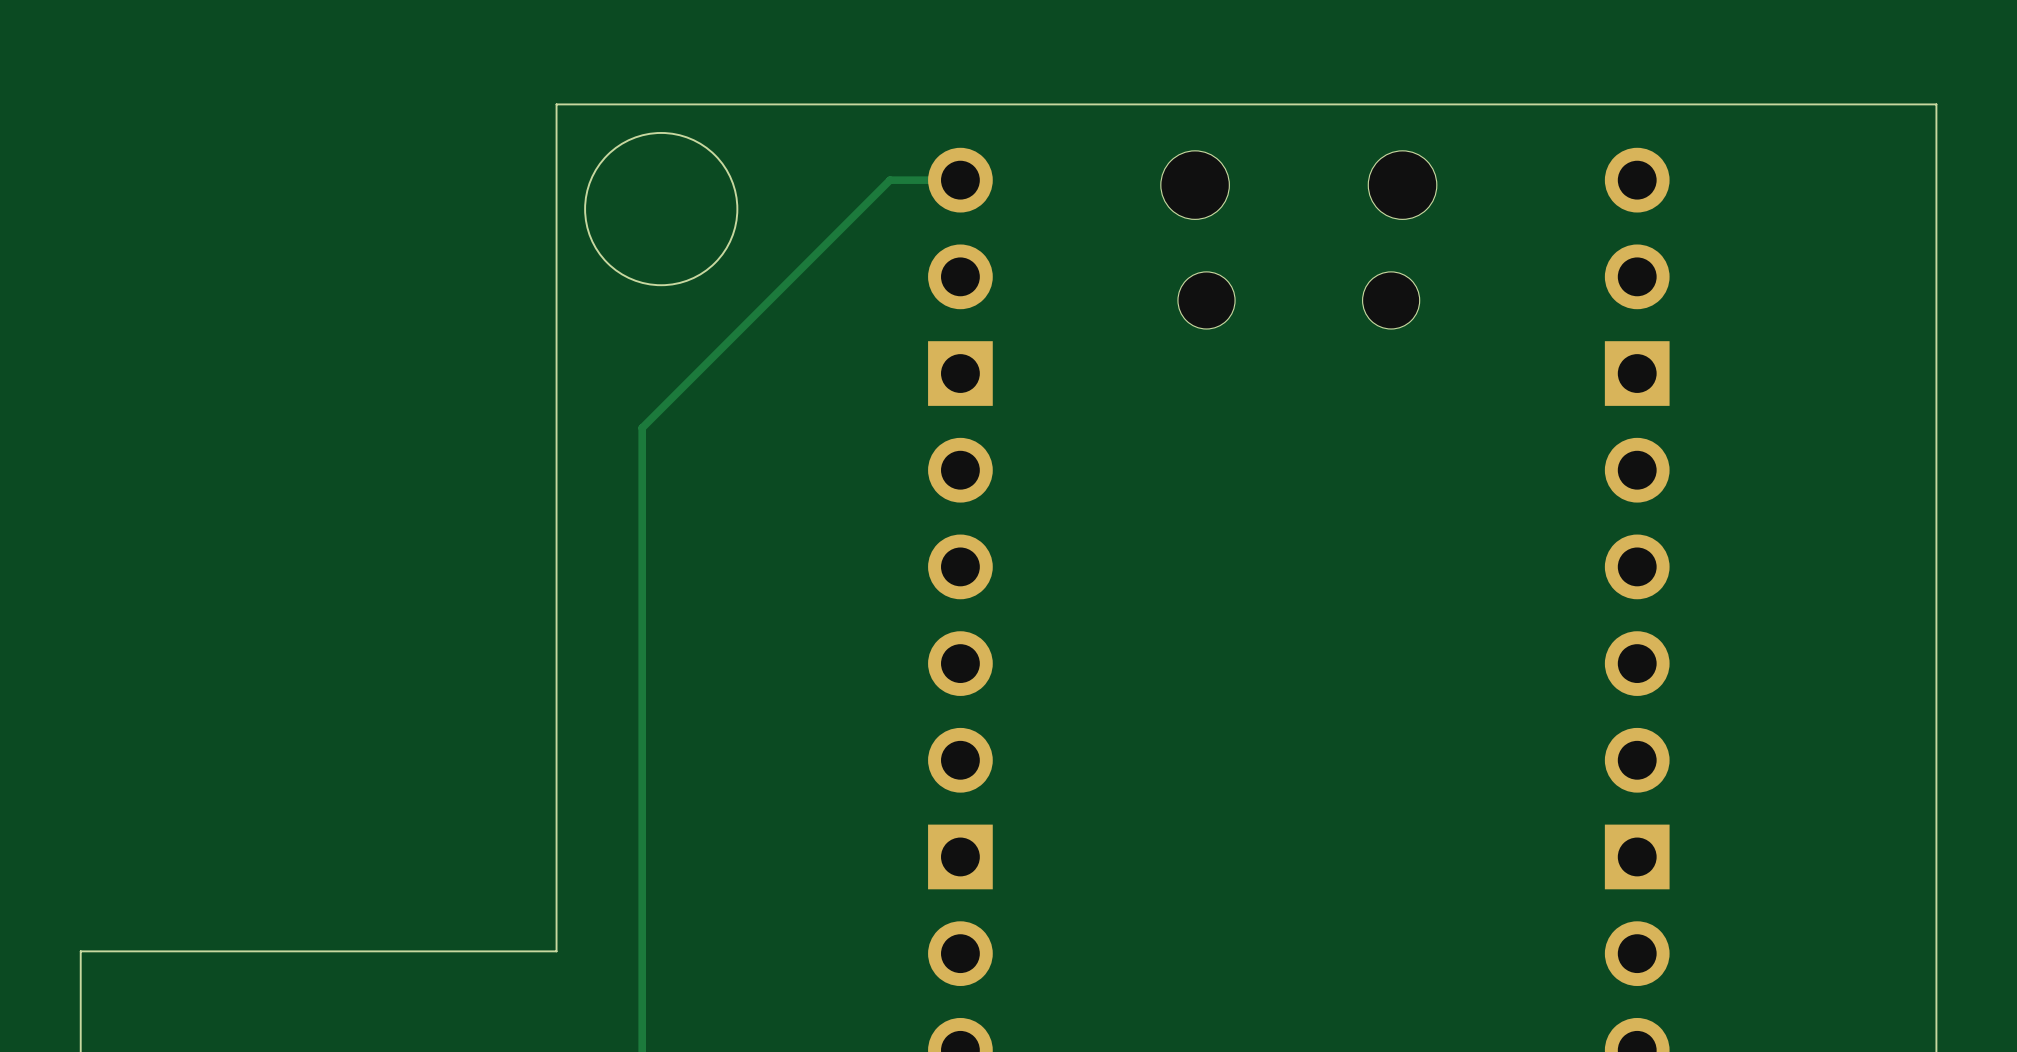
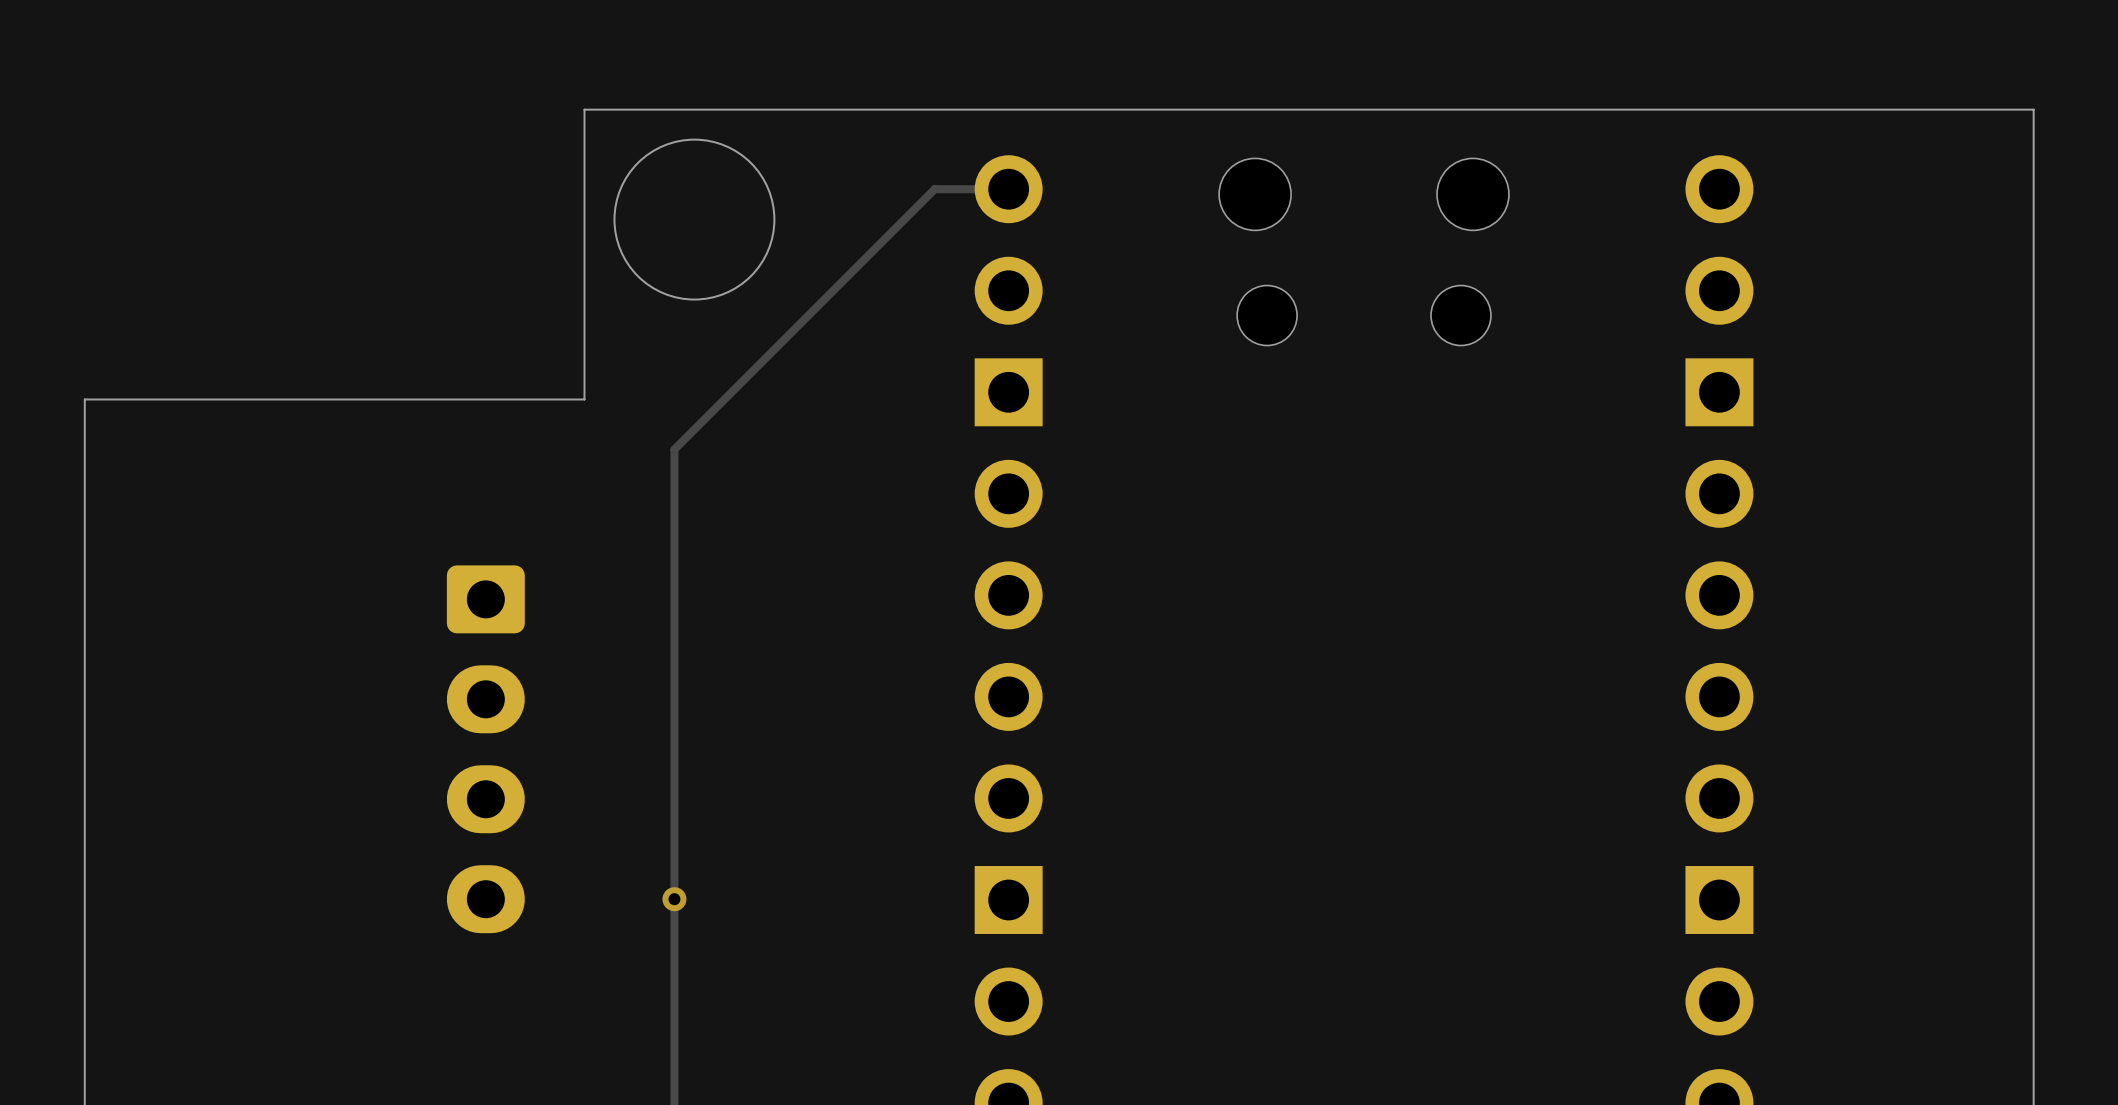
board edge: (556, 380) (556, 951) (80, 951) -> (584, 399) (84, 399) (84, 999)
part: none -> (485, 749)
via: none -> (674, 899)

